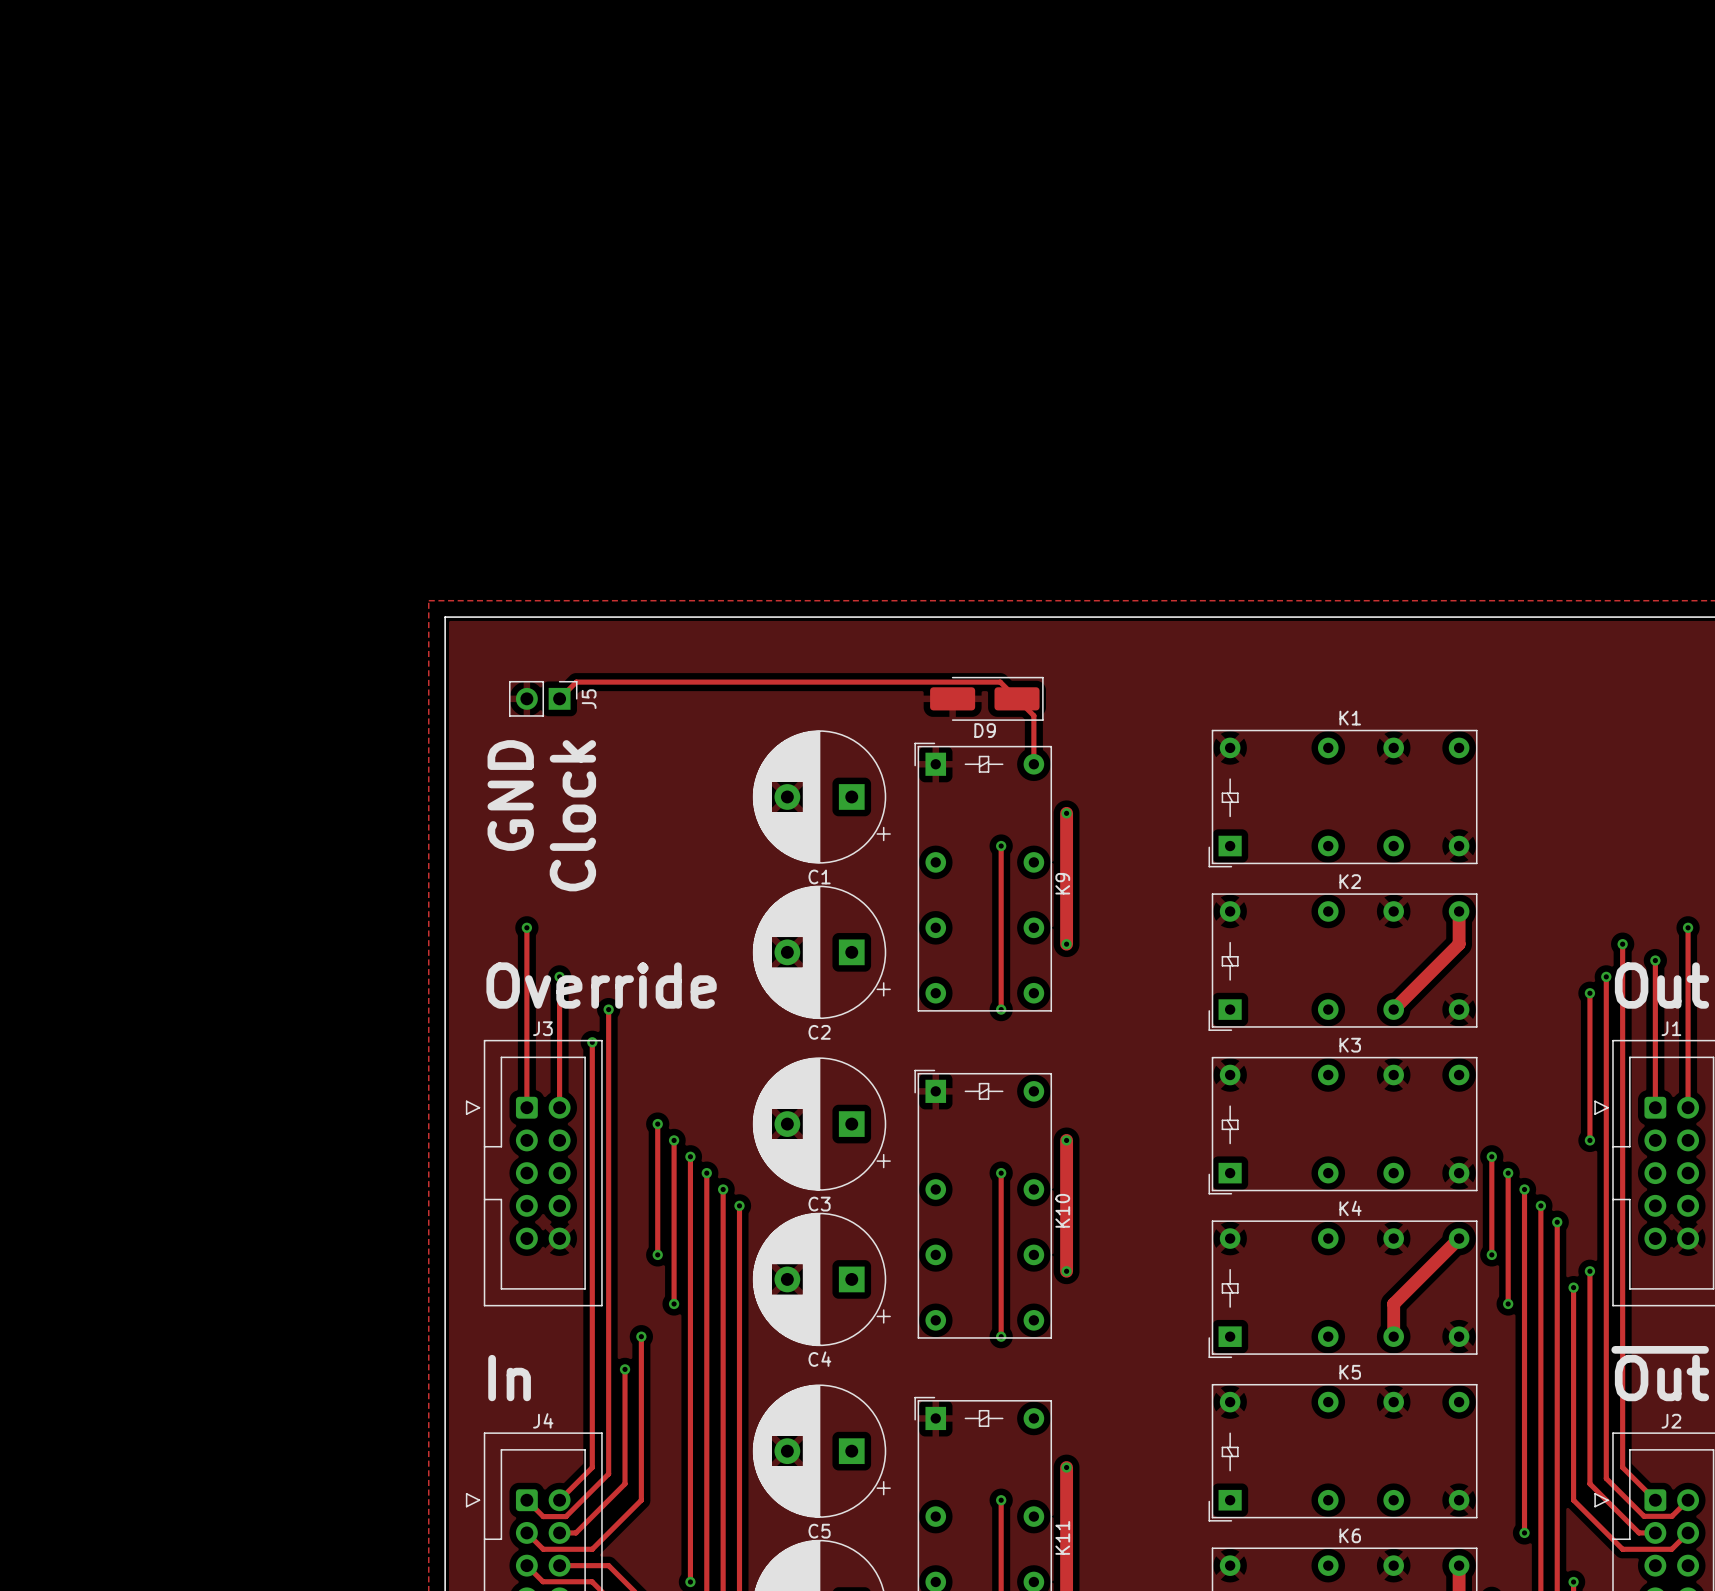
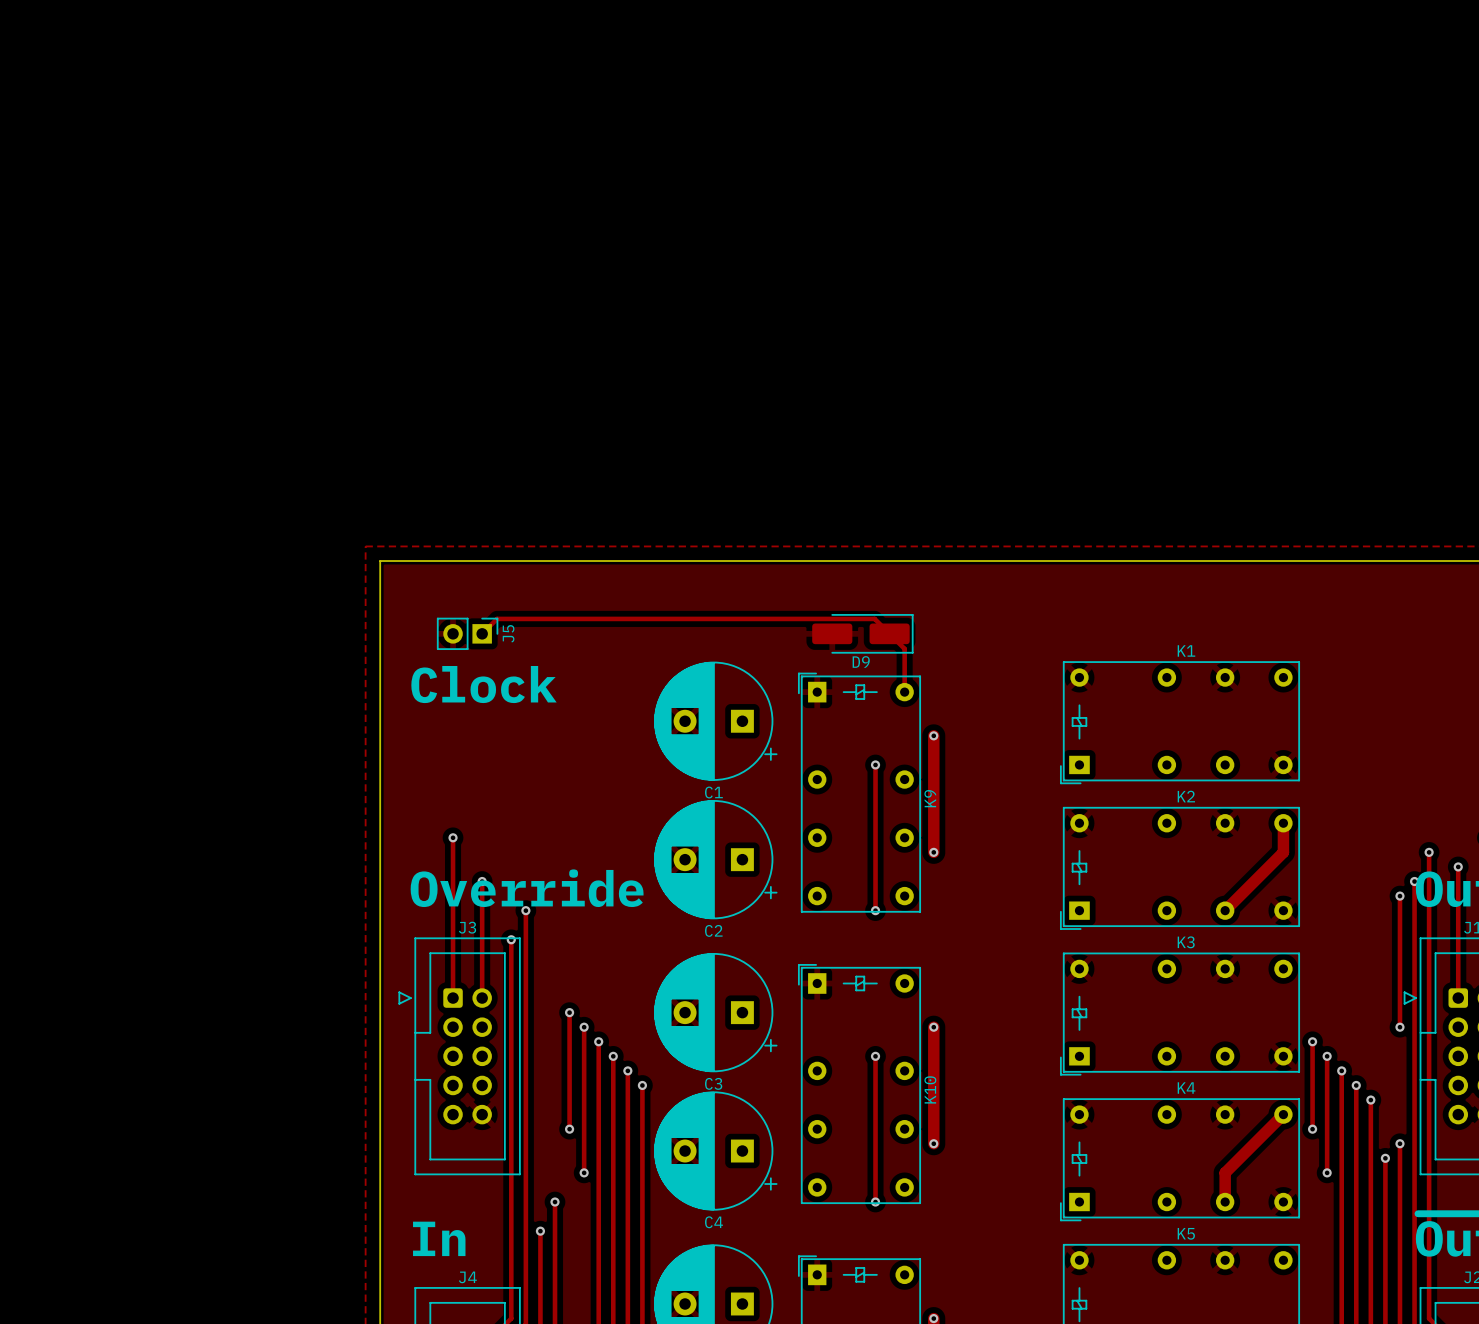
text: GND (510, 795) -> none
text rotation: 0° (572, 815) -> 90° clockwise (483, 684)

